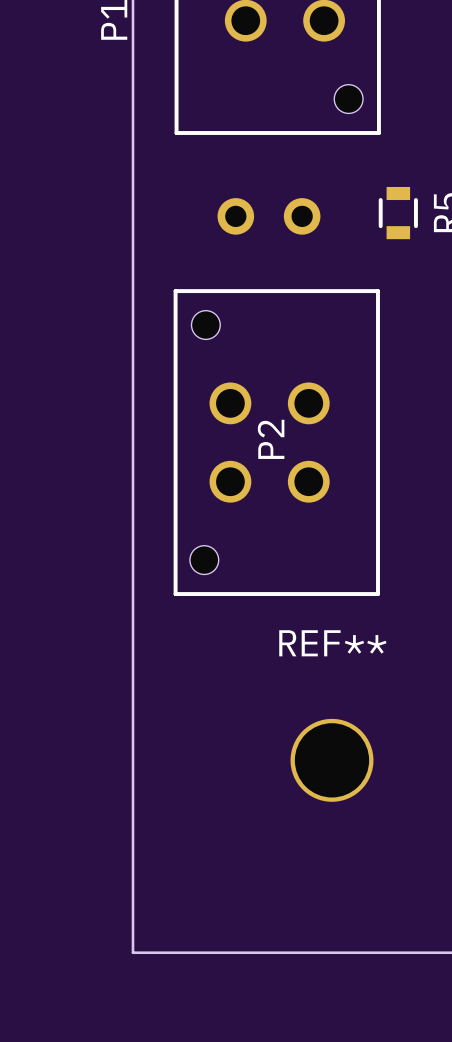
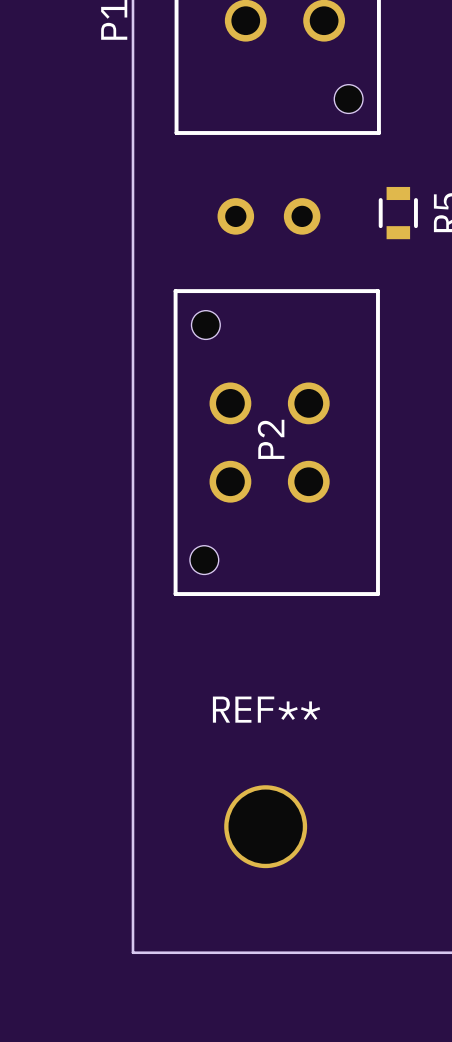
REF** position: (332, 760) -> (265, 826)

